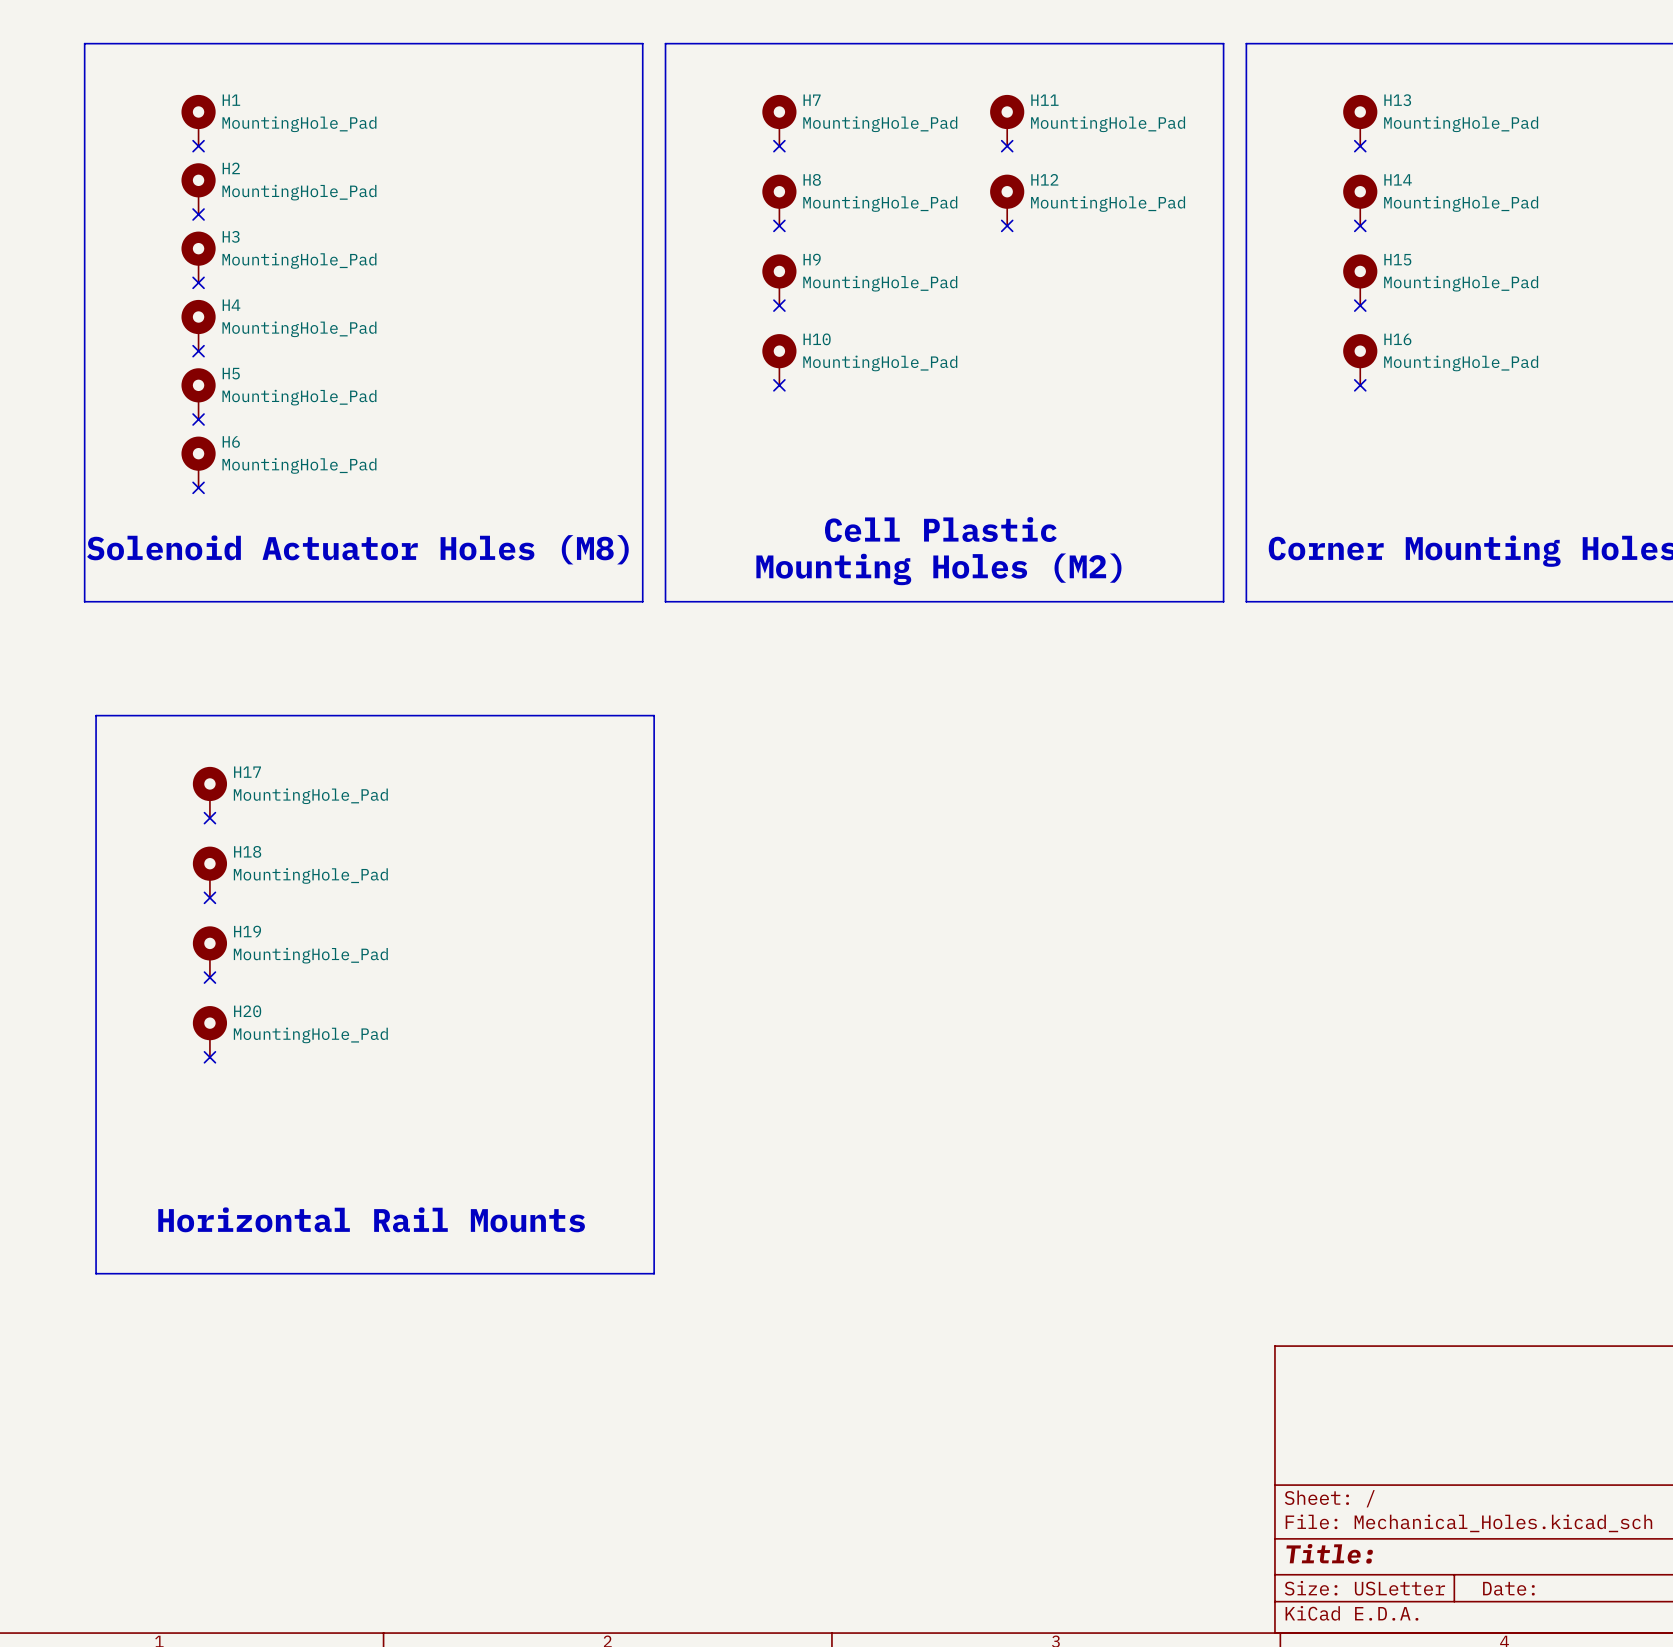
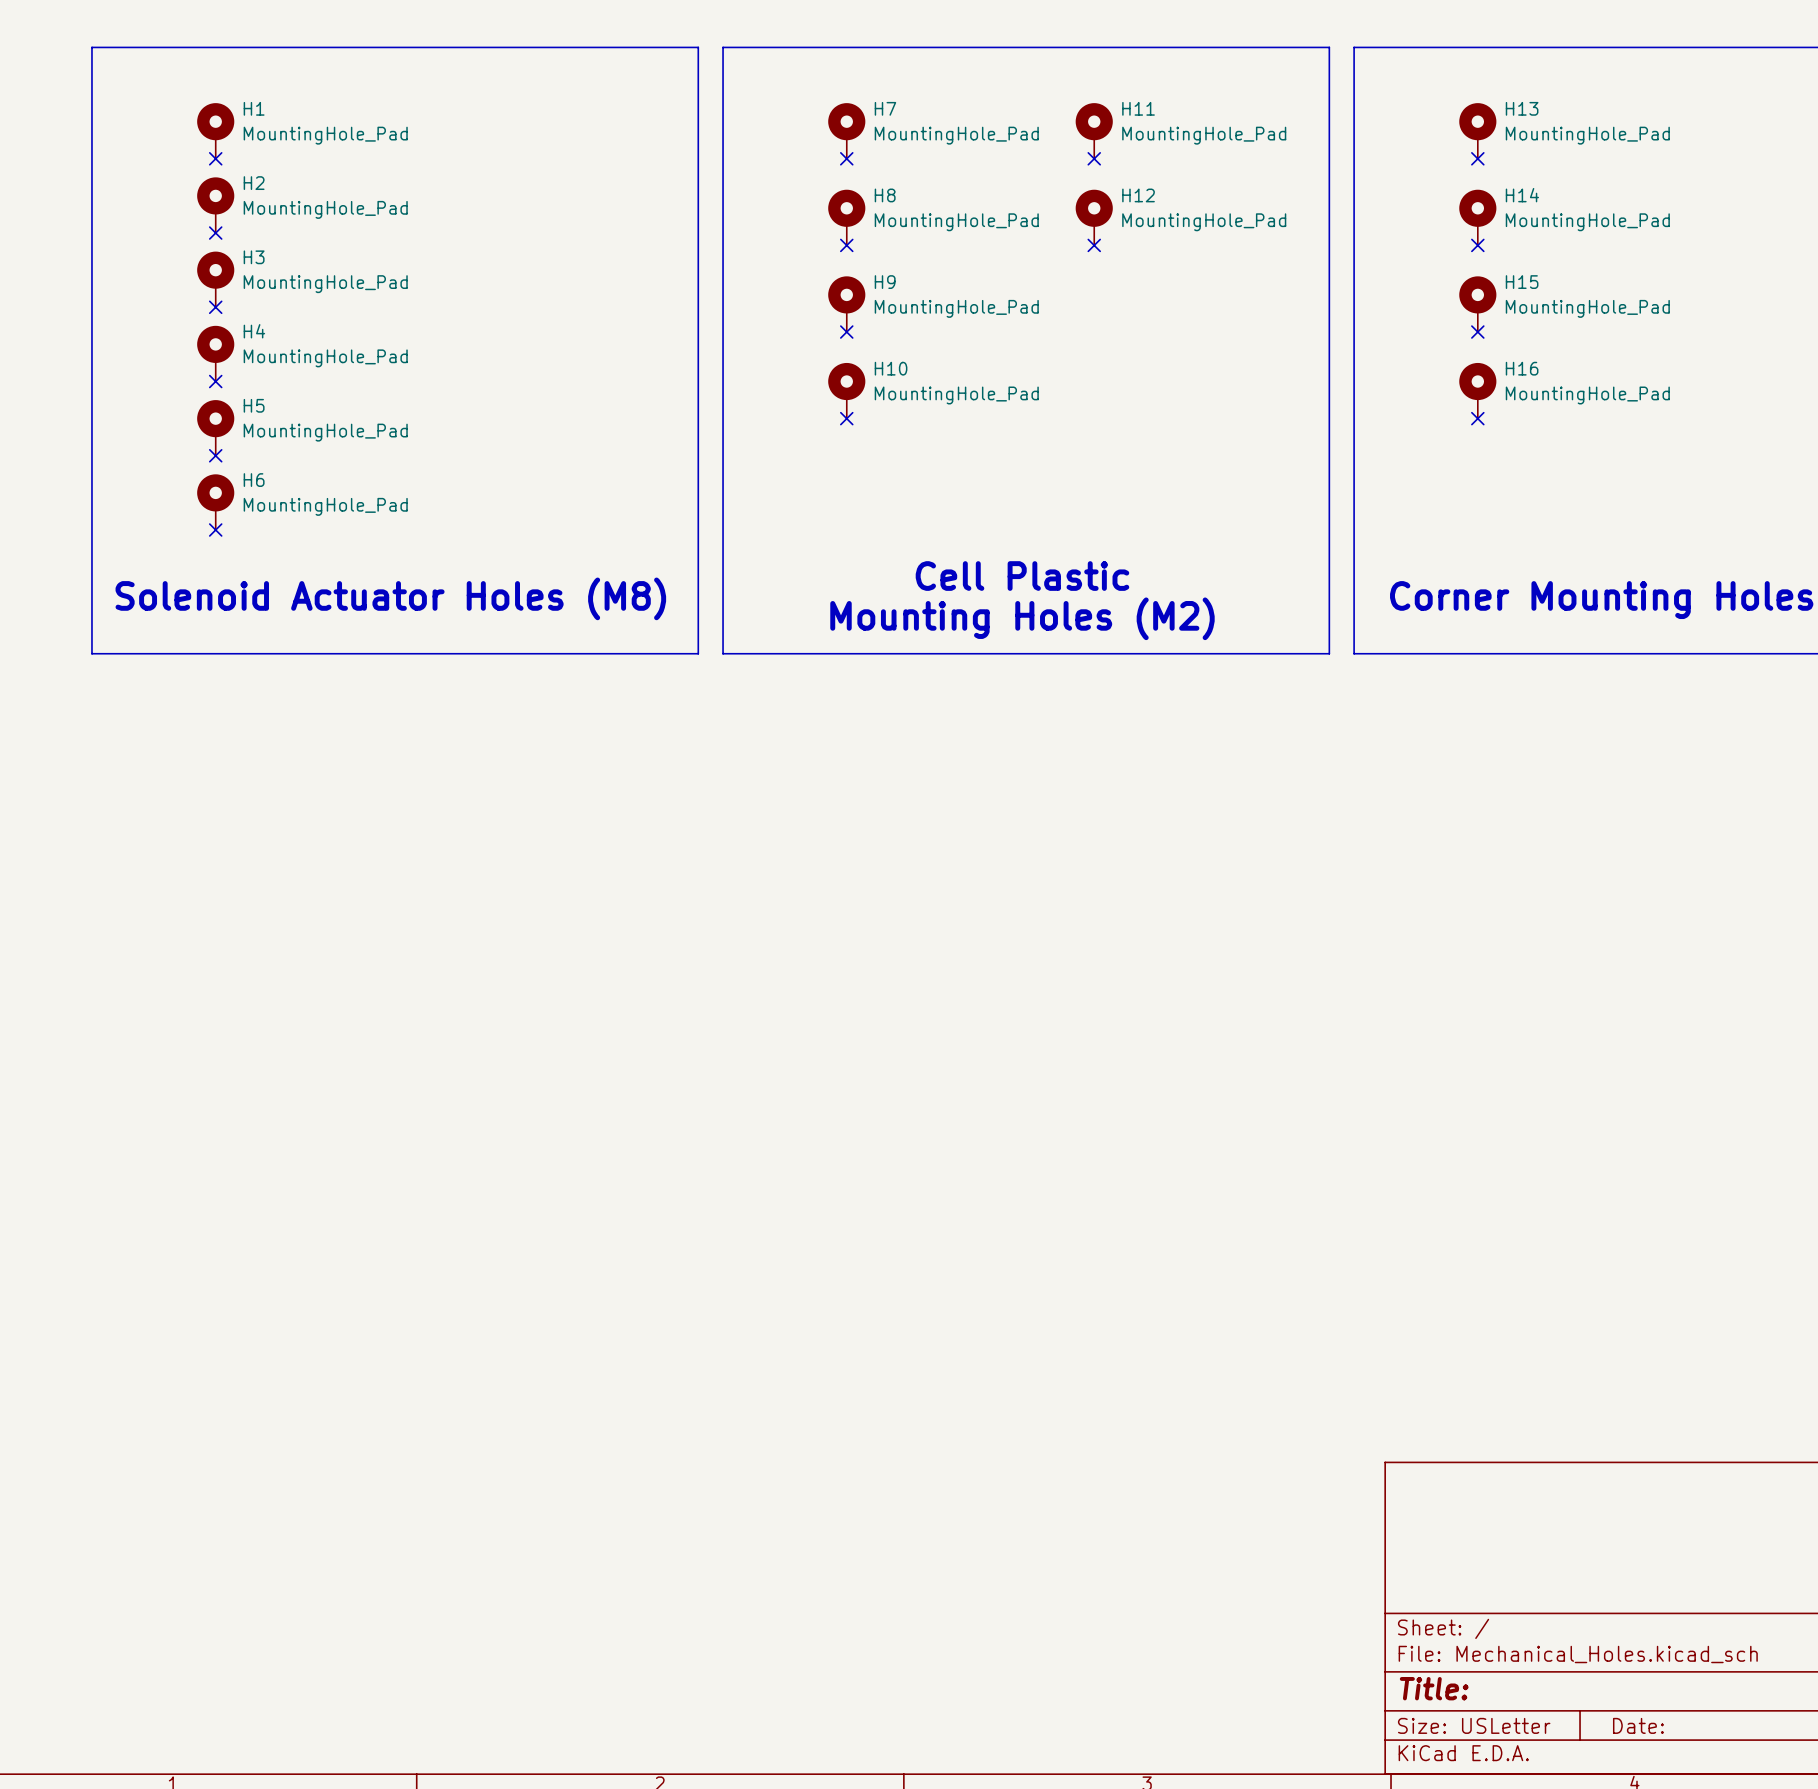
line: (96, 715) (654, 715) (654, 1273) (96, 1273) (96, 715) -> none
H17: MountingHole_Pad (209, 792) -> none
no-connect mark: (209, 818) -> none
H18: MountingHole_Pad (209, 872) -> none
no-connect mark: (209, 897) -> none
H19: MountingHole_Pad (209, 951) -> none
no-connect mark: (209, 977) -> none
H20: MountingHole_Pad (209, 1031) -> none
no-connect mark: (209, 1057) -> none
text: Horizontal Rail Mounts (371, 1219) -> none

